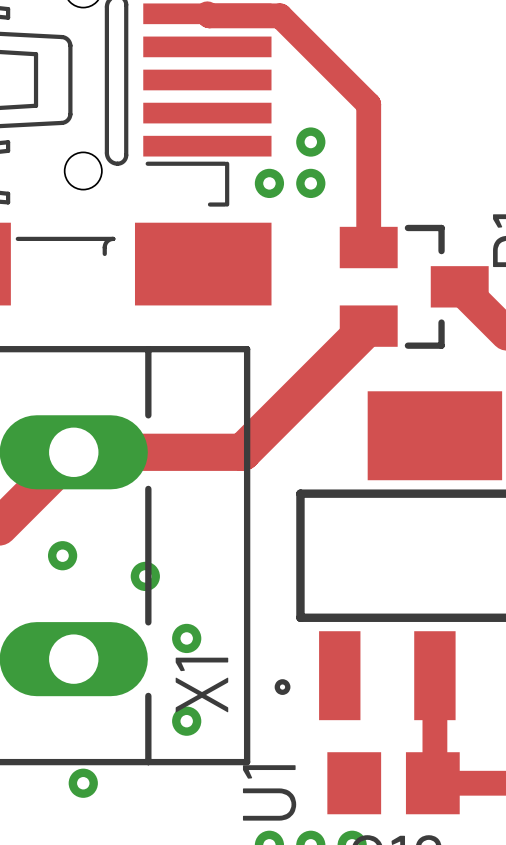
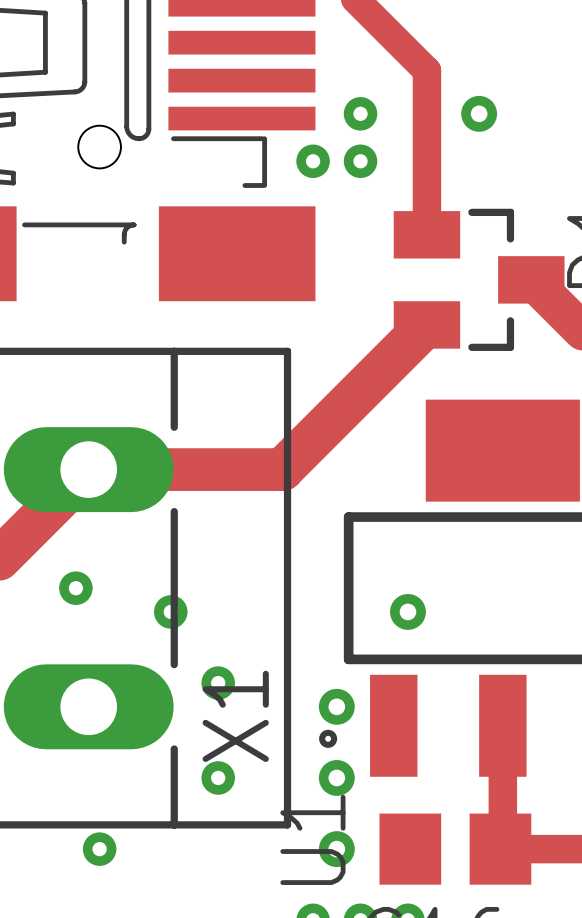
via: none -> (479, 113)
via: none -> (407, 611)
via: none -> (336, 706)
via: none -> (336, 777)
via: none -> (336, 849)

